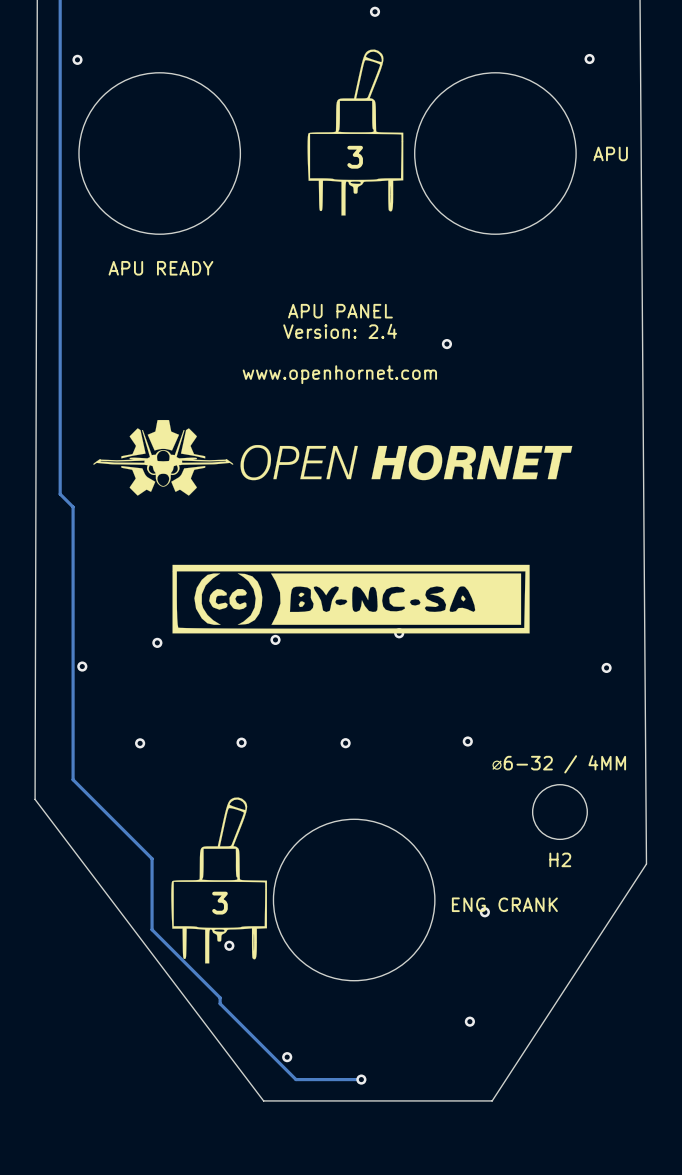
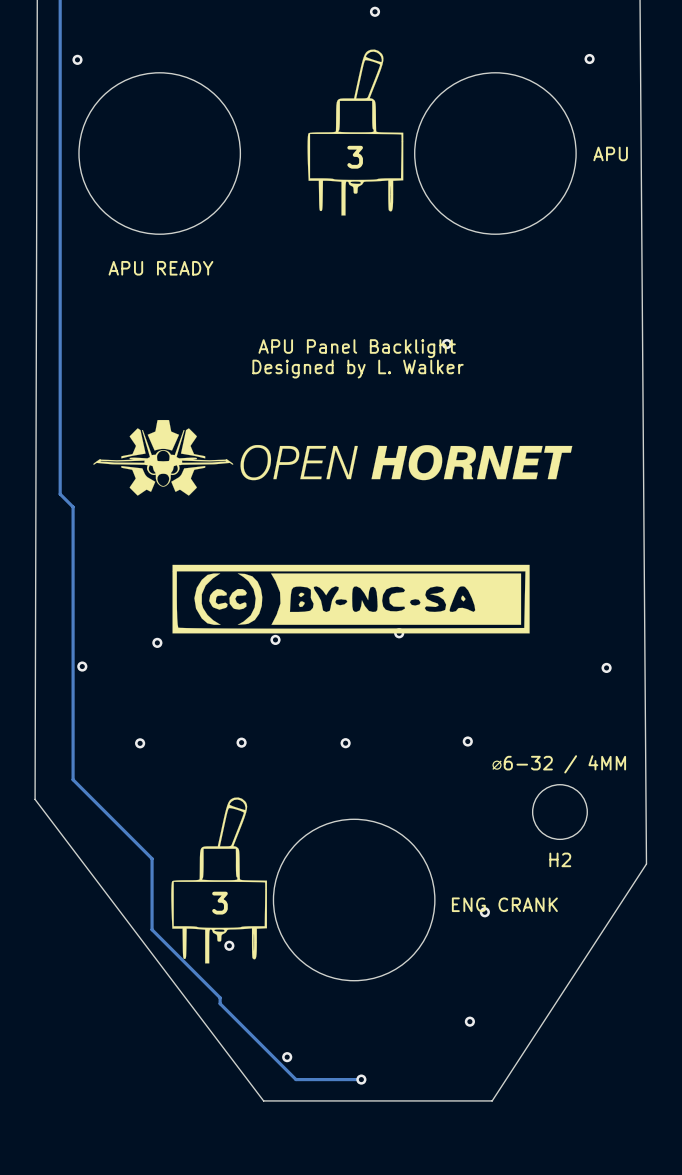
text: APU PANEL (340, 311) -> none
text: Version: 2.4 (340, 331) -> none
text: none -> APU Panel Backlight (357, 348)
text: none -> Designed by L. Walker (358, 369)
text: www.openhornet.com (339, 374) -> none

